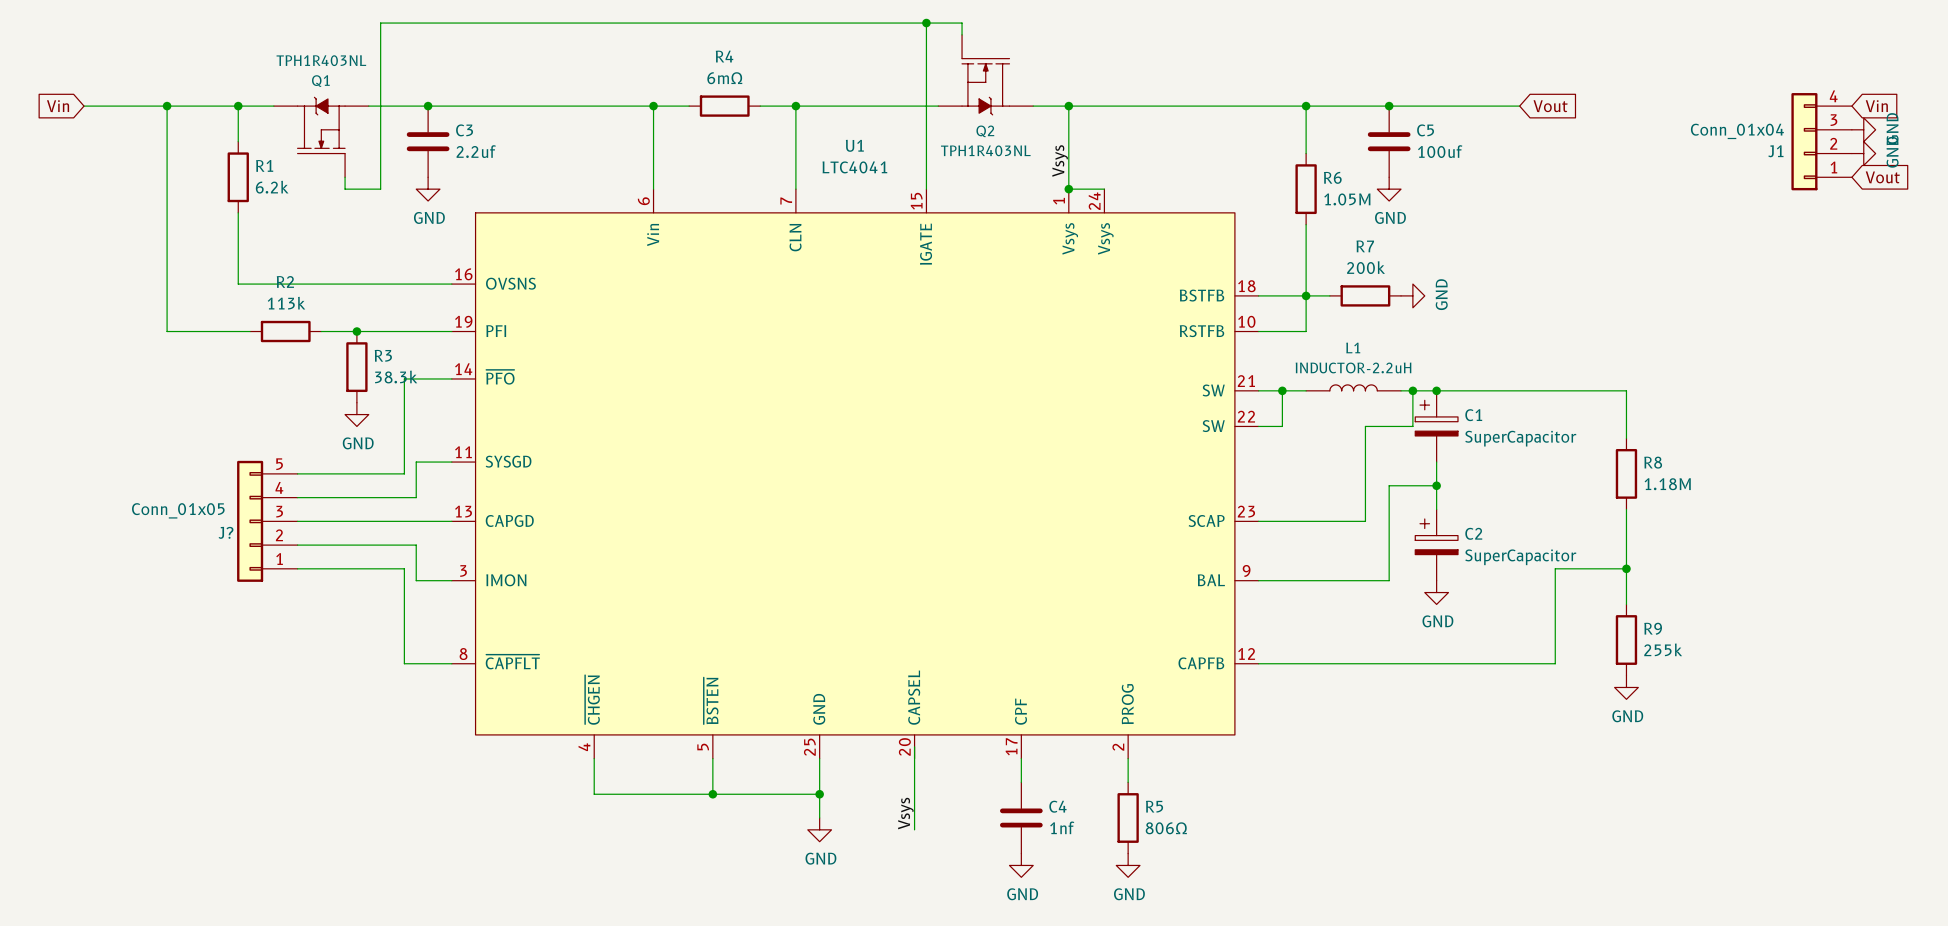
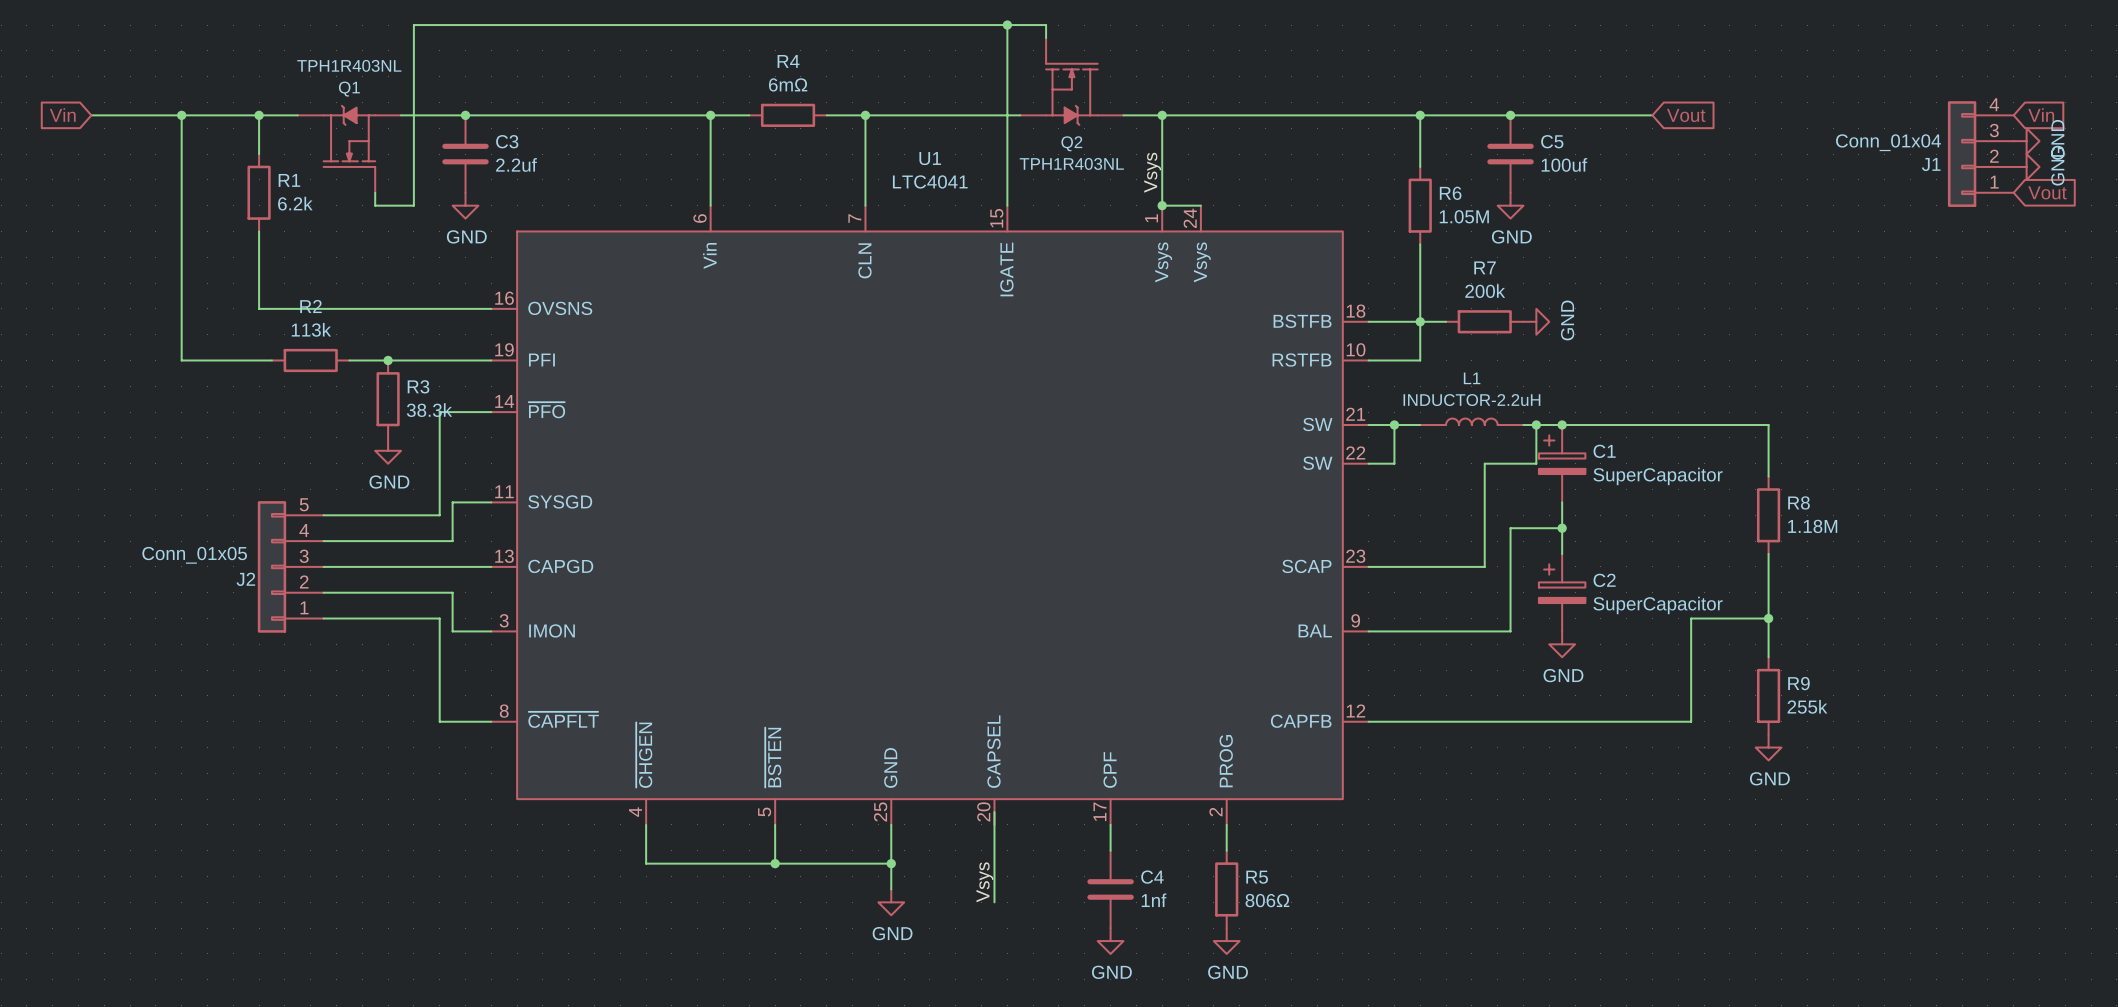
J? name: J? (226, 532) -> J2 (245, 579)

